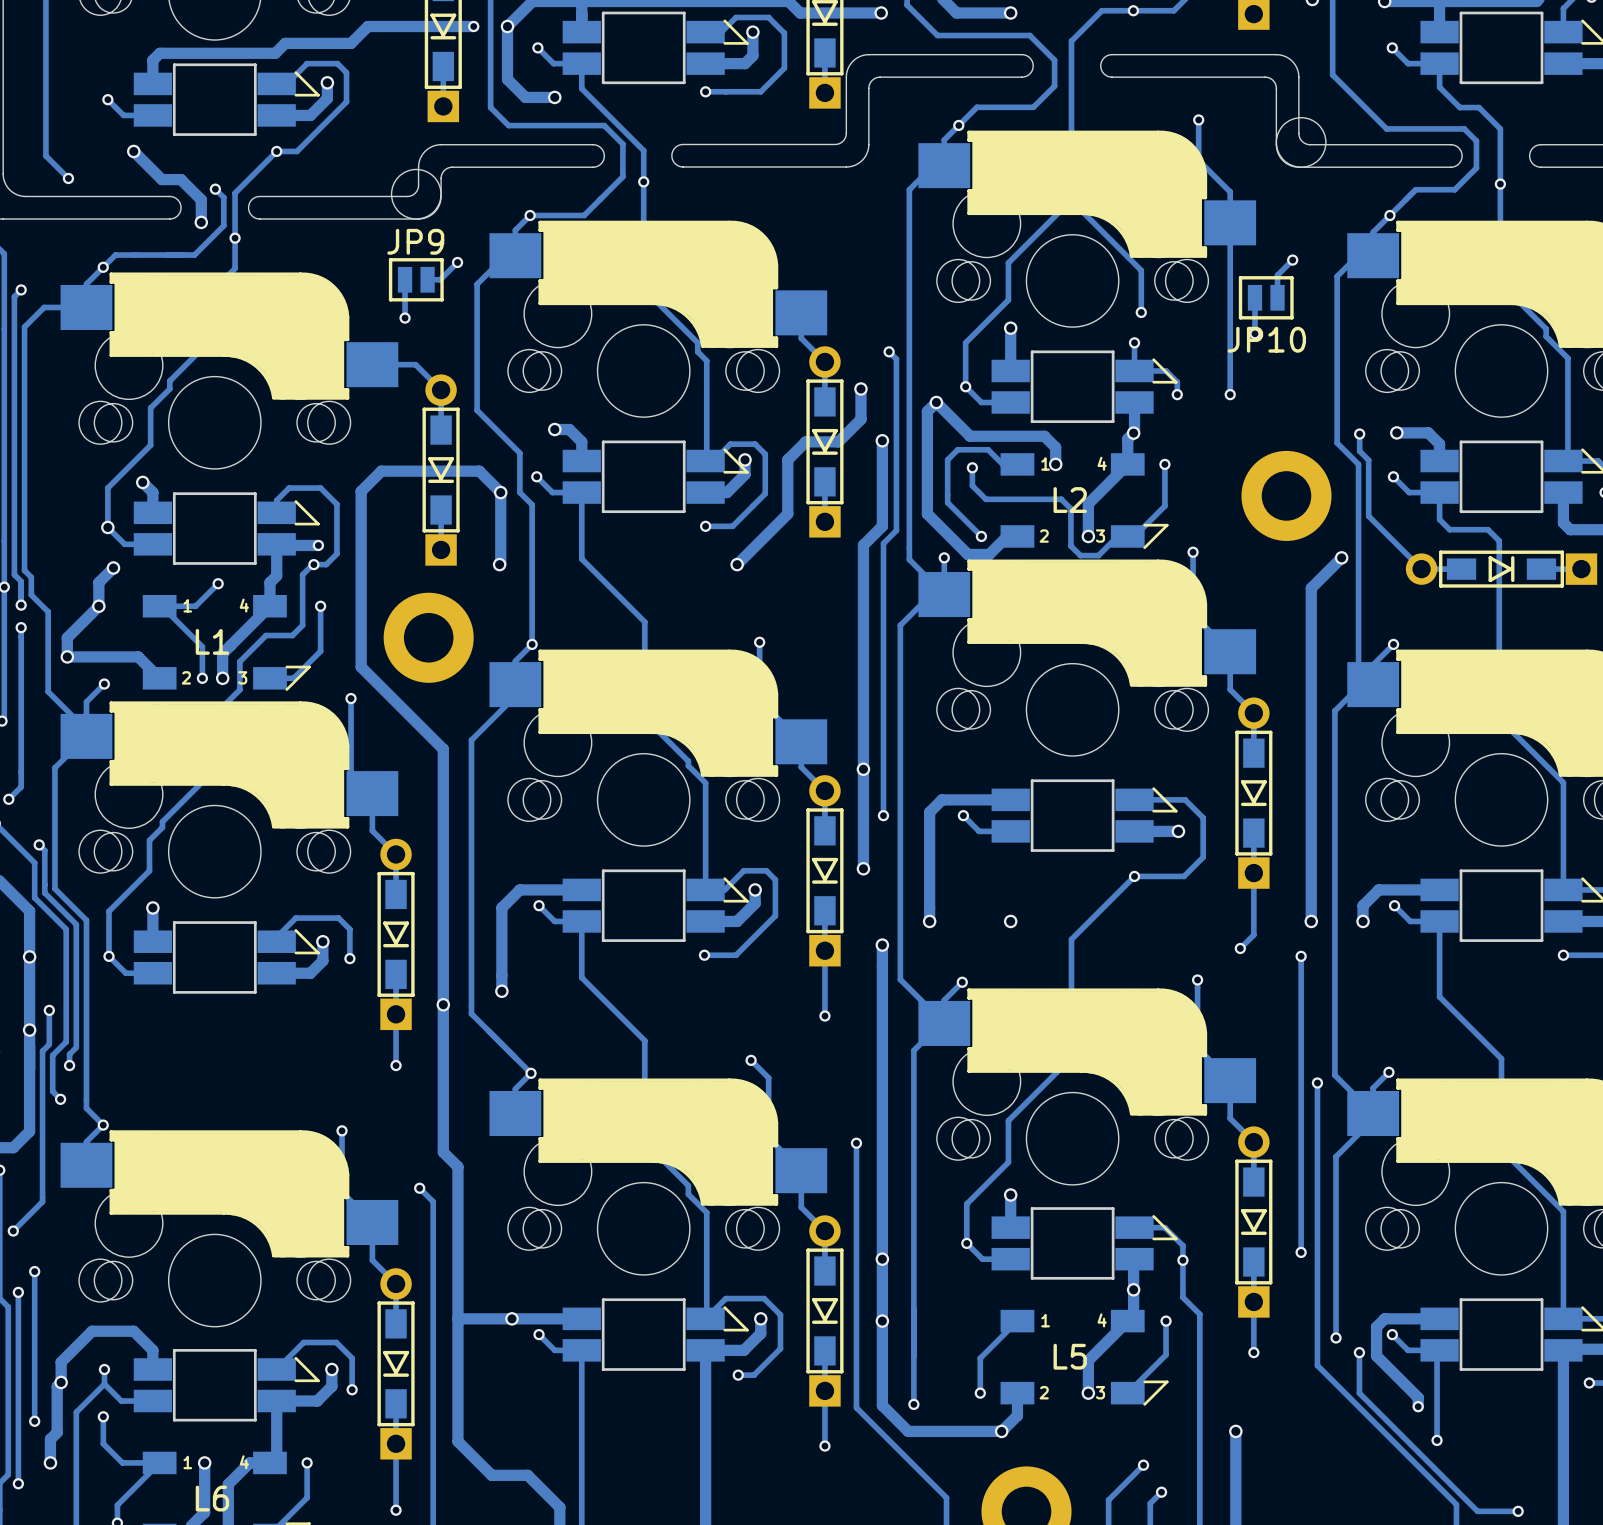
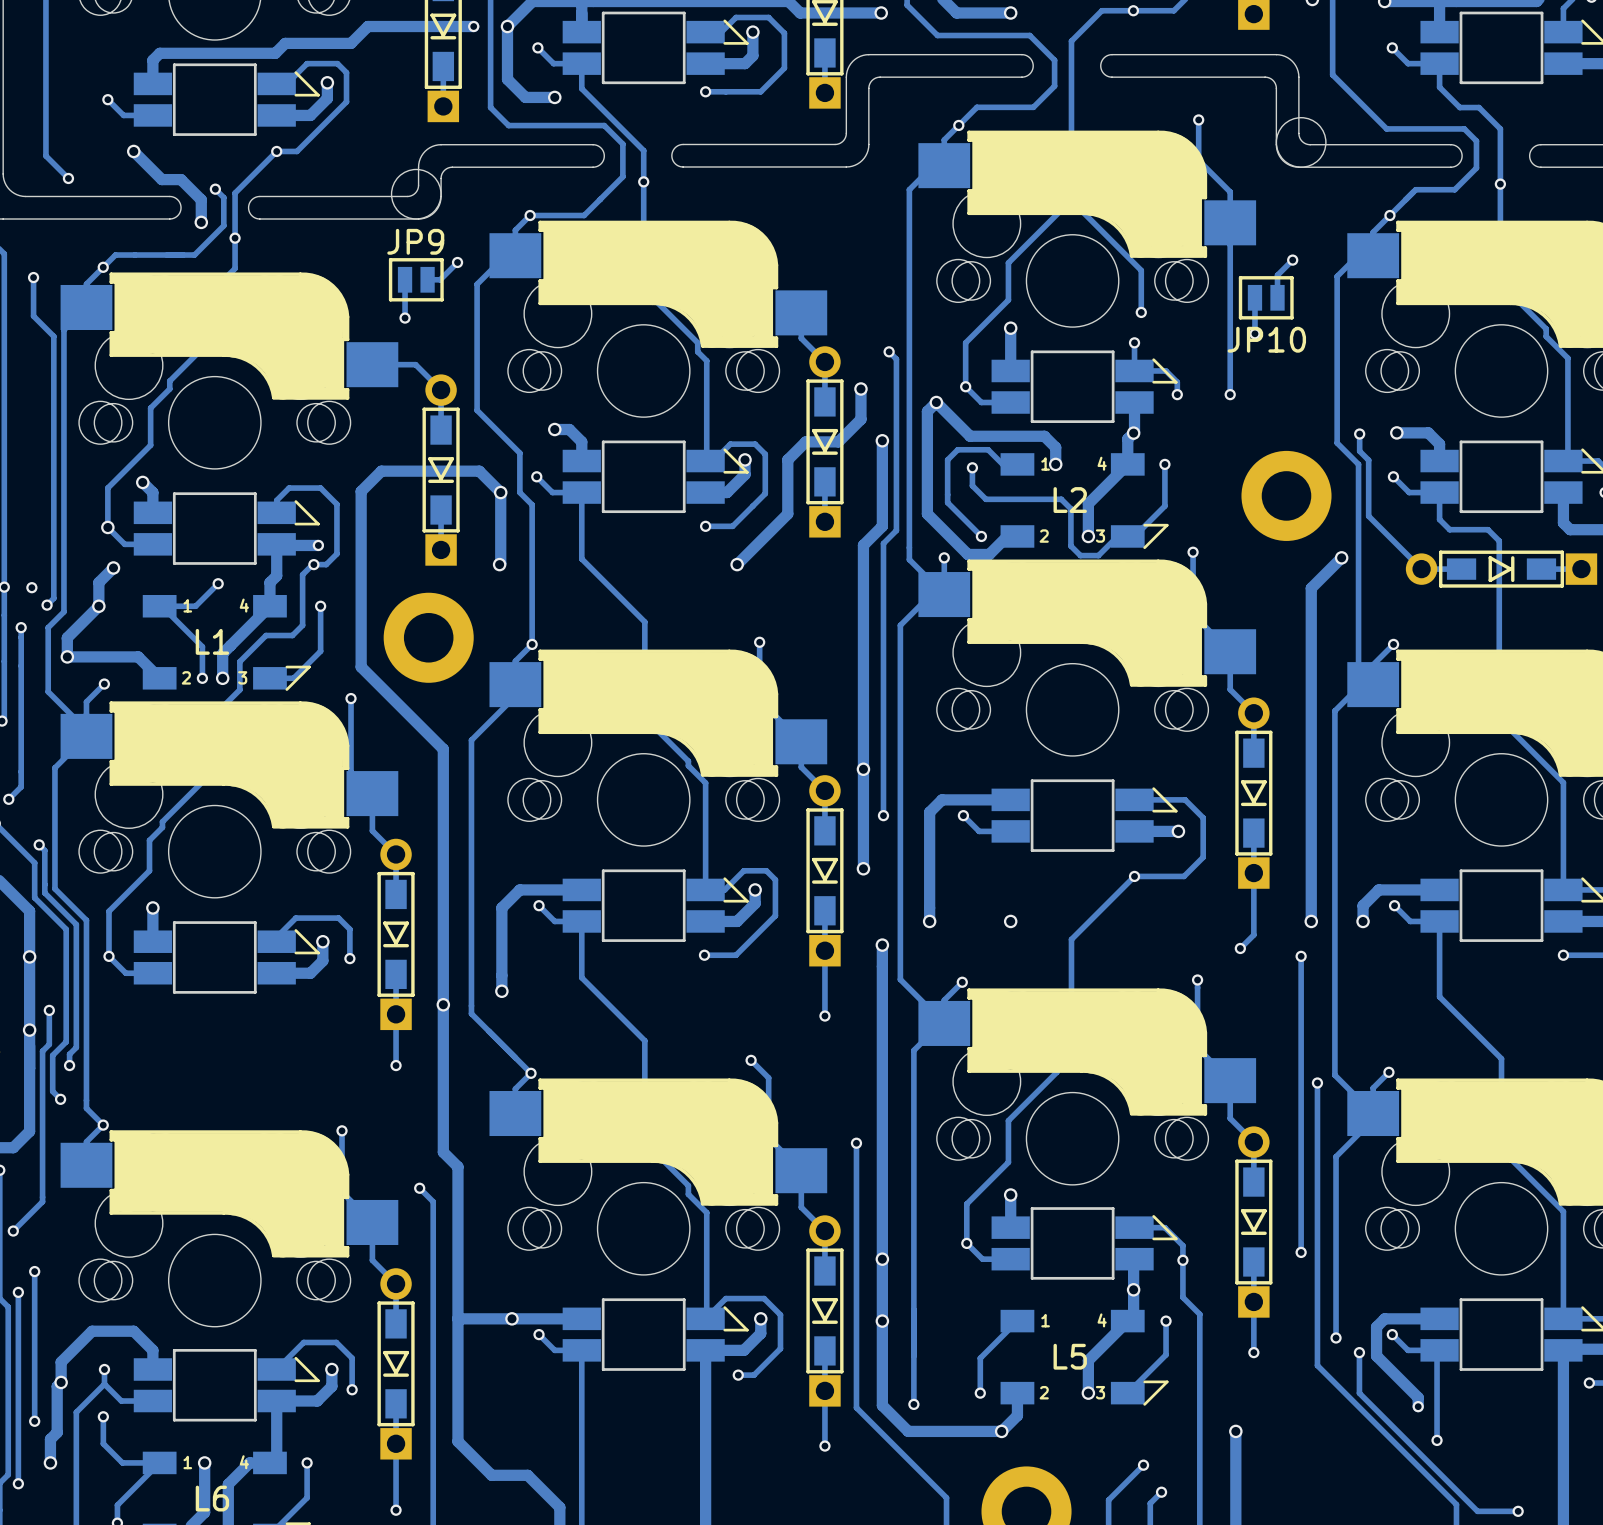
track: none -> (33, 277) (33, 316) (53, 336) (53, 598) (47, 605)
track: (21, 289) (14, 296) (14, 574) (21, 581) (21, 605) -> none
via position: (21, 289) -> (33, 277)
track: (86, 307) (44, 307) (24, 327) (24, 570) (31, 577) (31, 595) (48, 611) (48, 627) -> (86, 307) (63, 330) (63, 611) (48, 627)
via: none -> (31, 587)
via: (21, 605) -> none
via: none -> (47, 605)

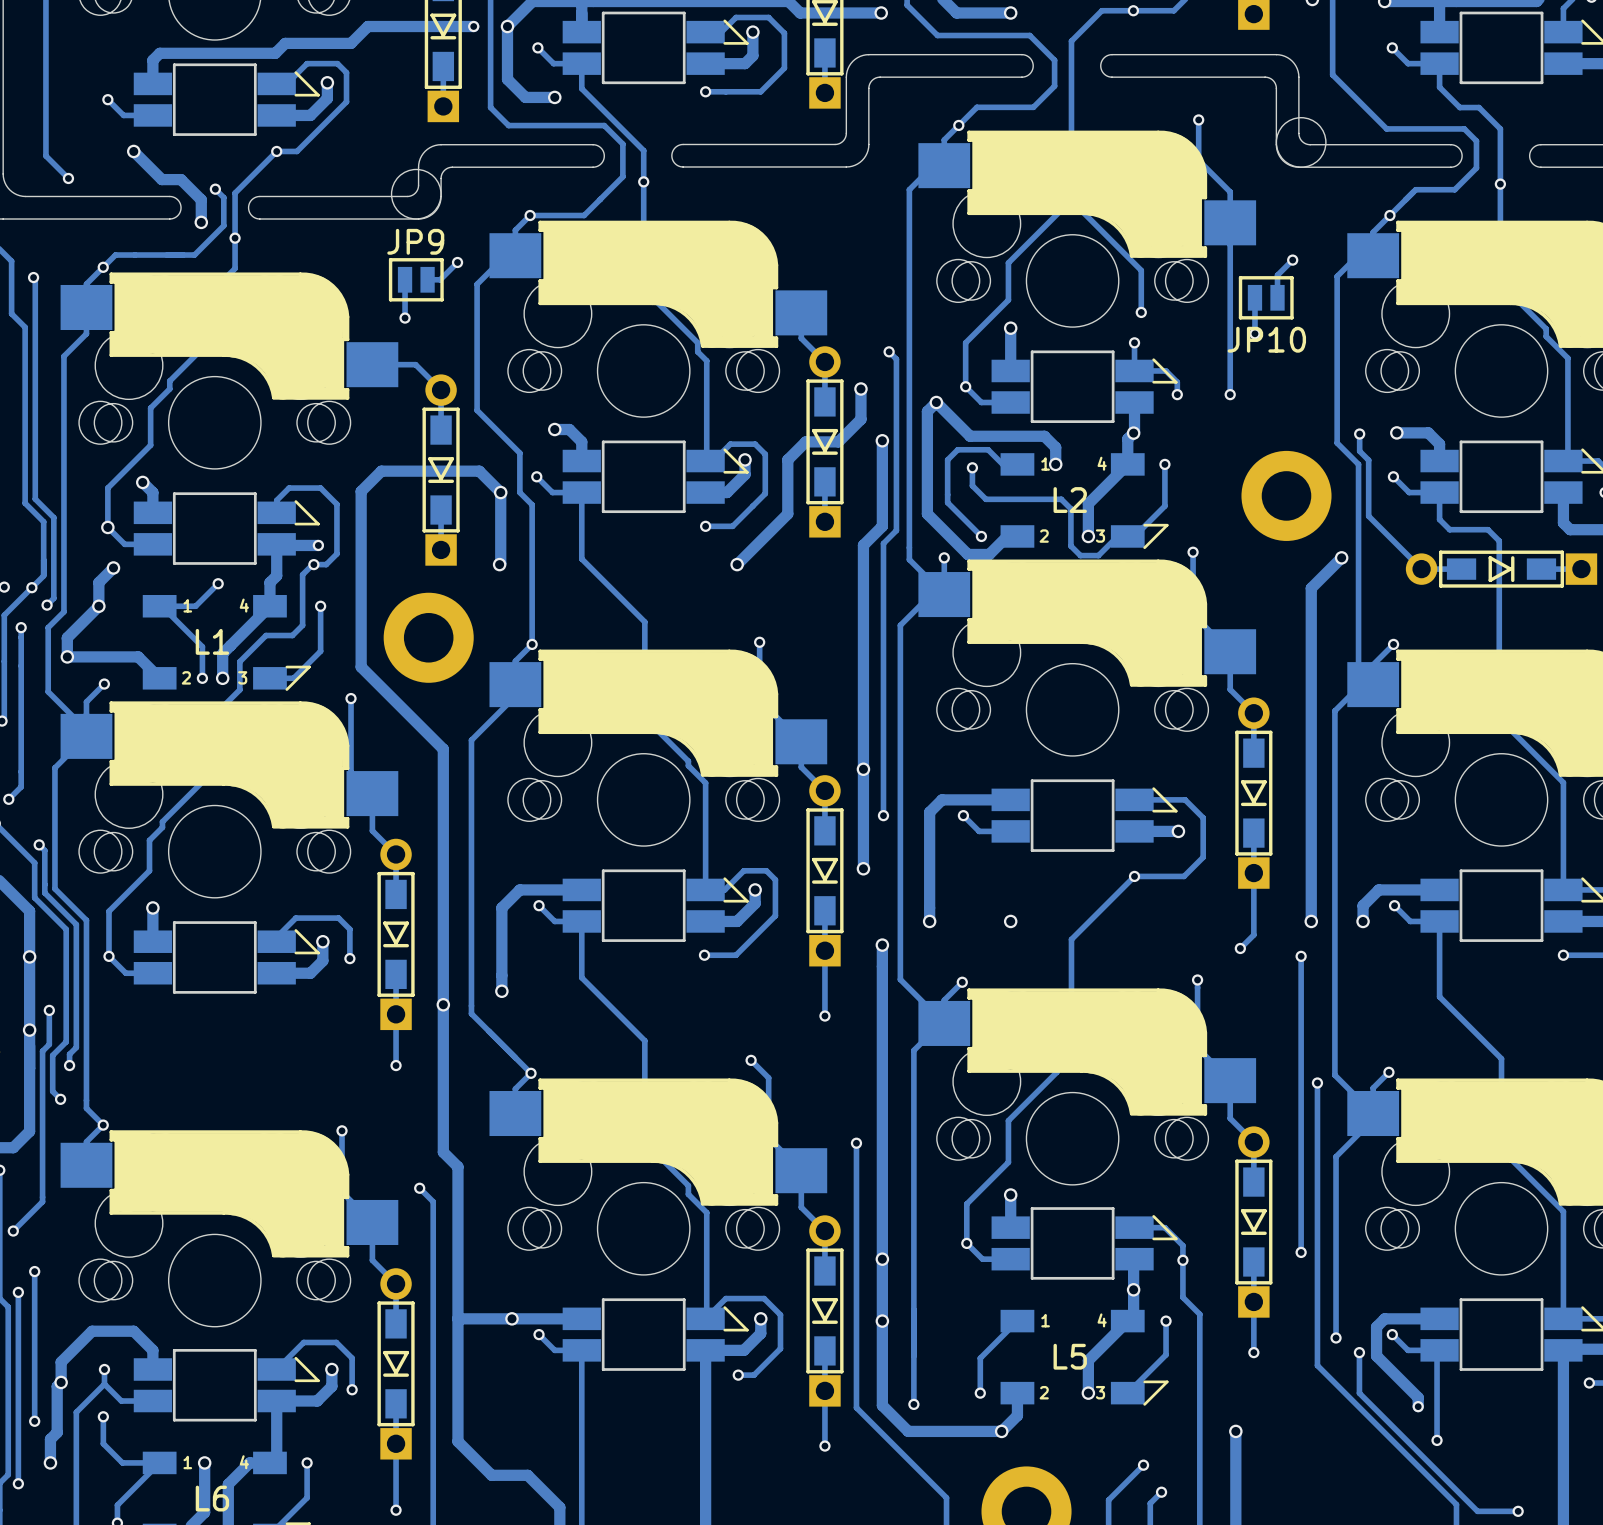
track: (4, 253) (4, 615) -> (4, 253) (11, 261) (11, 313) (25, 327) (25, 503) (43, 521) (43, 575) (4, 615)
track: (33, 277) (33, 316) (53, 336) (53, 517) -> (35, 279) (35, 499) (53, 517)
track: (86, 307) (63, 330) (63, 356) -> (86, 307) (86, 333) (63, 356)

